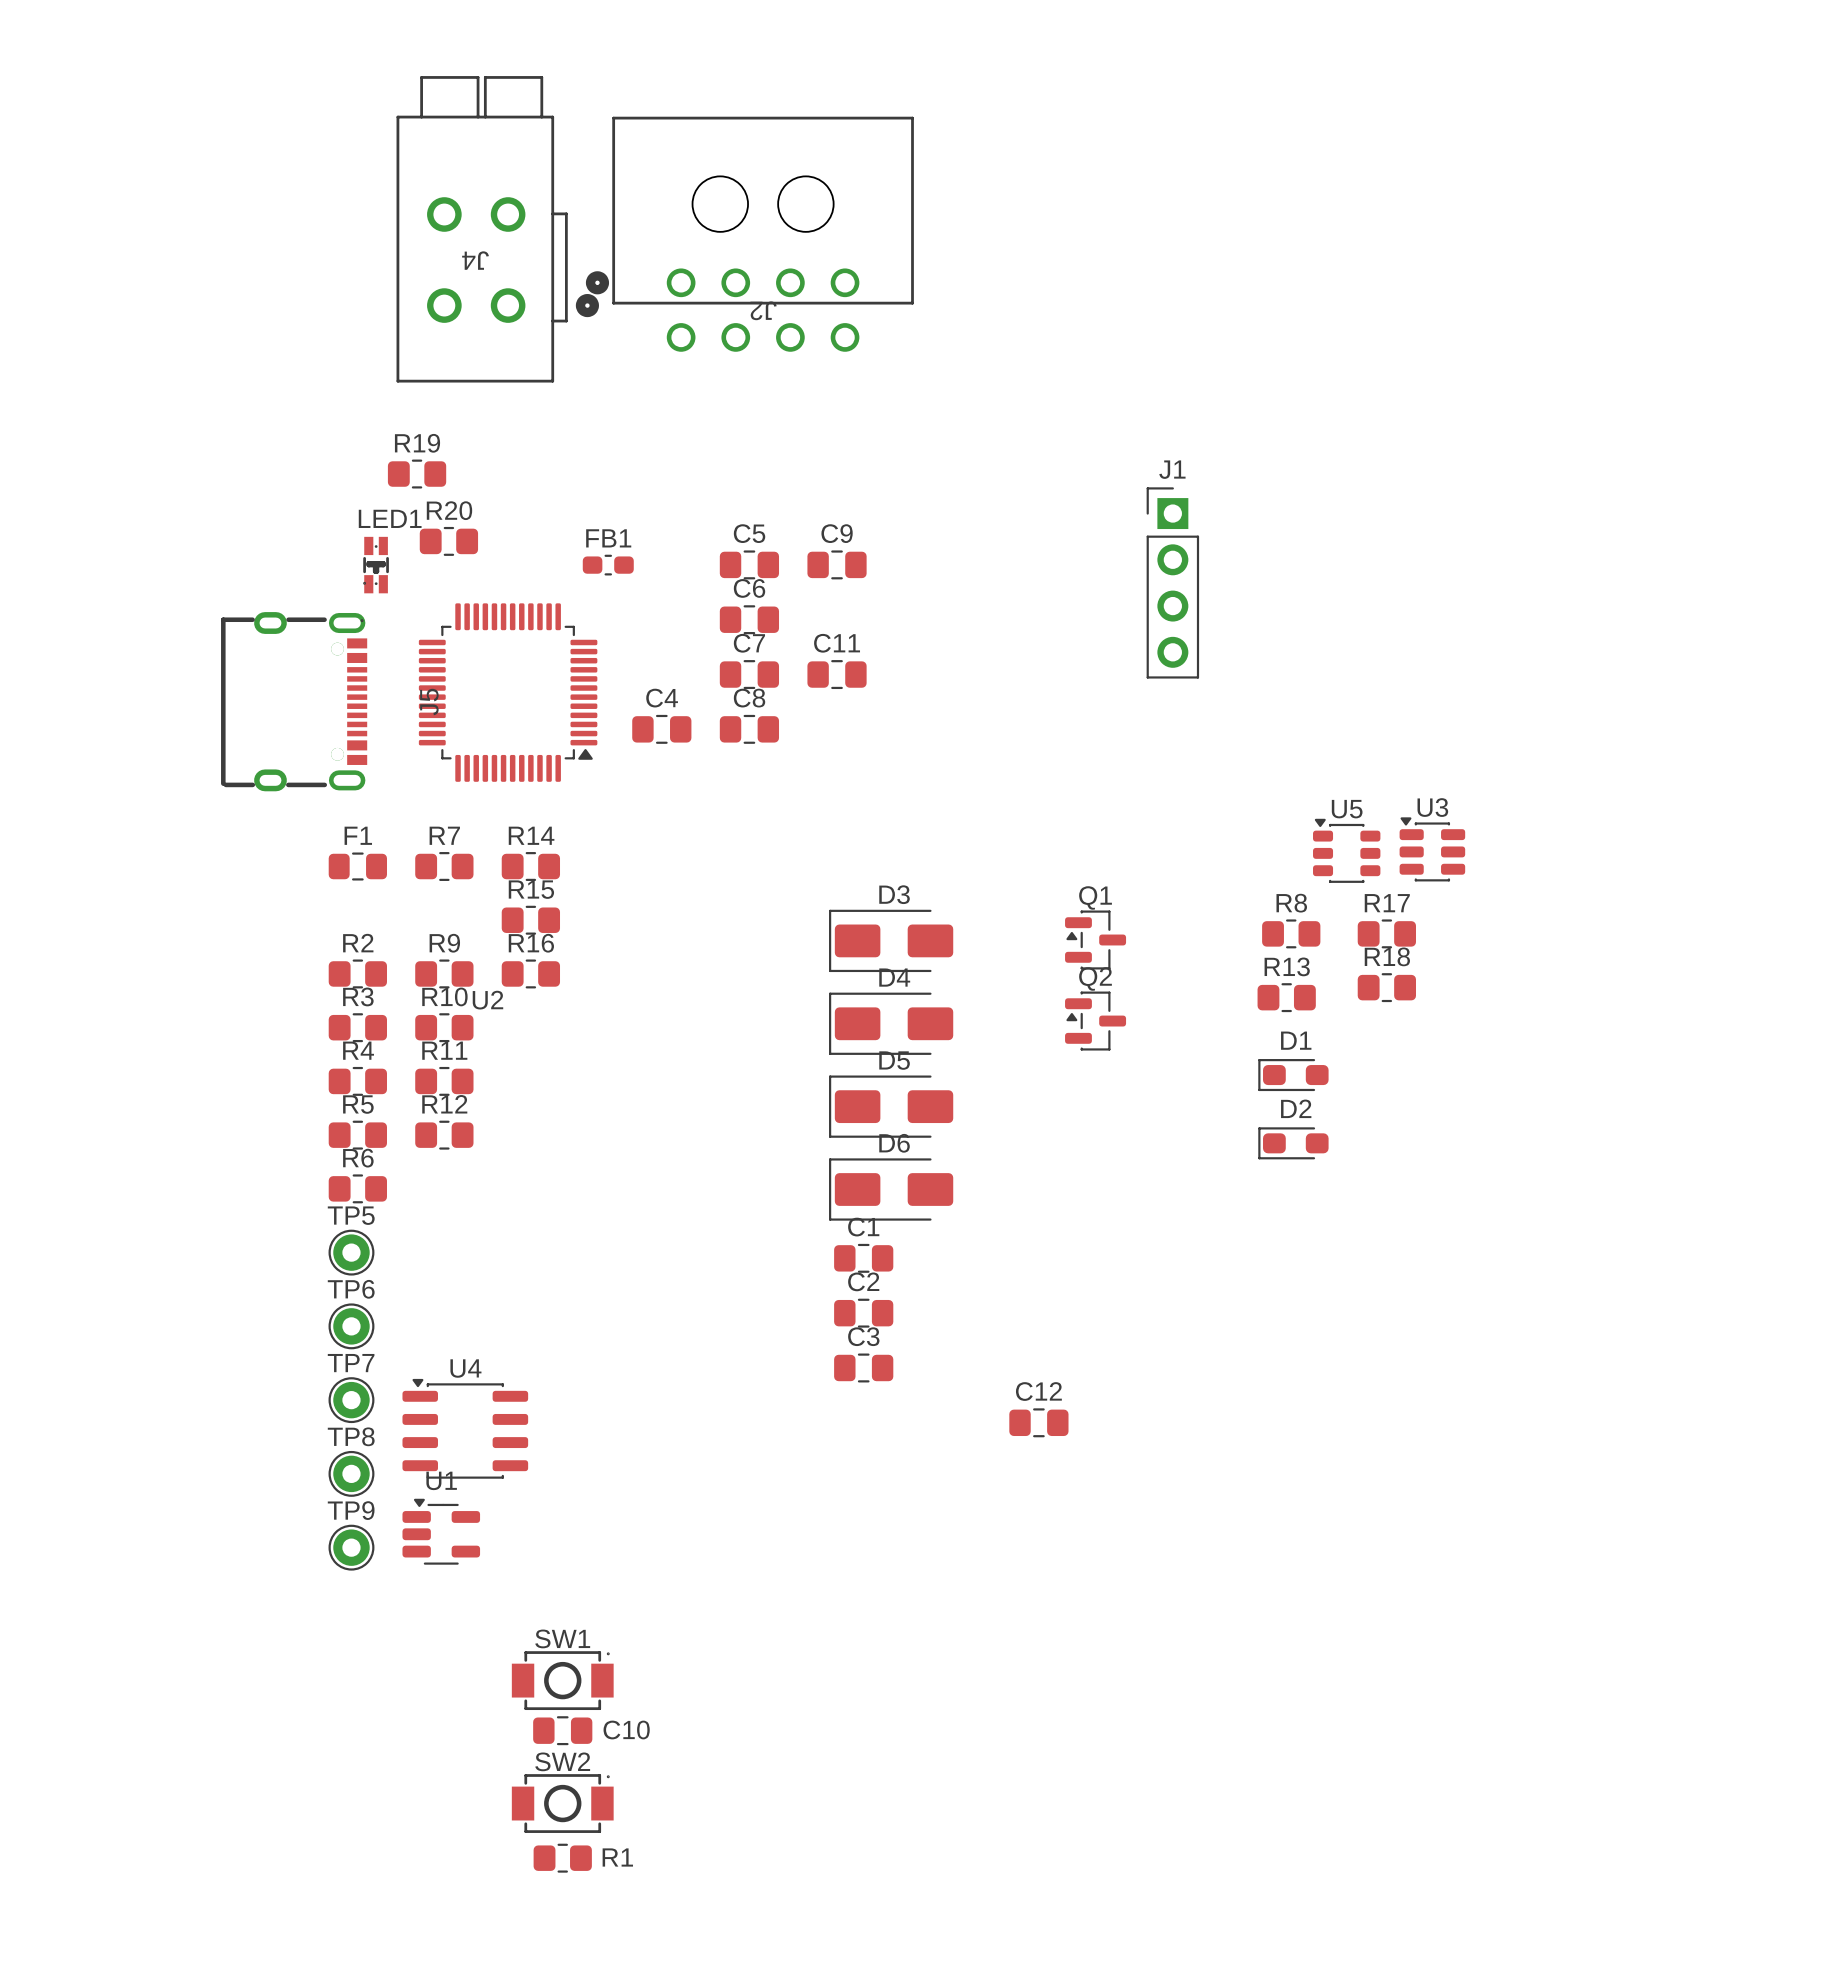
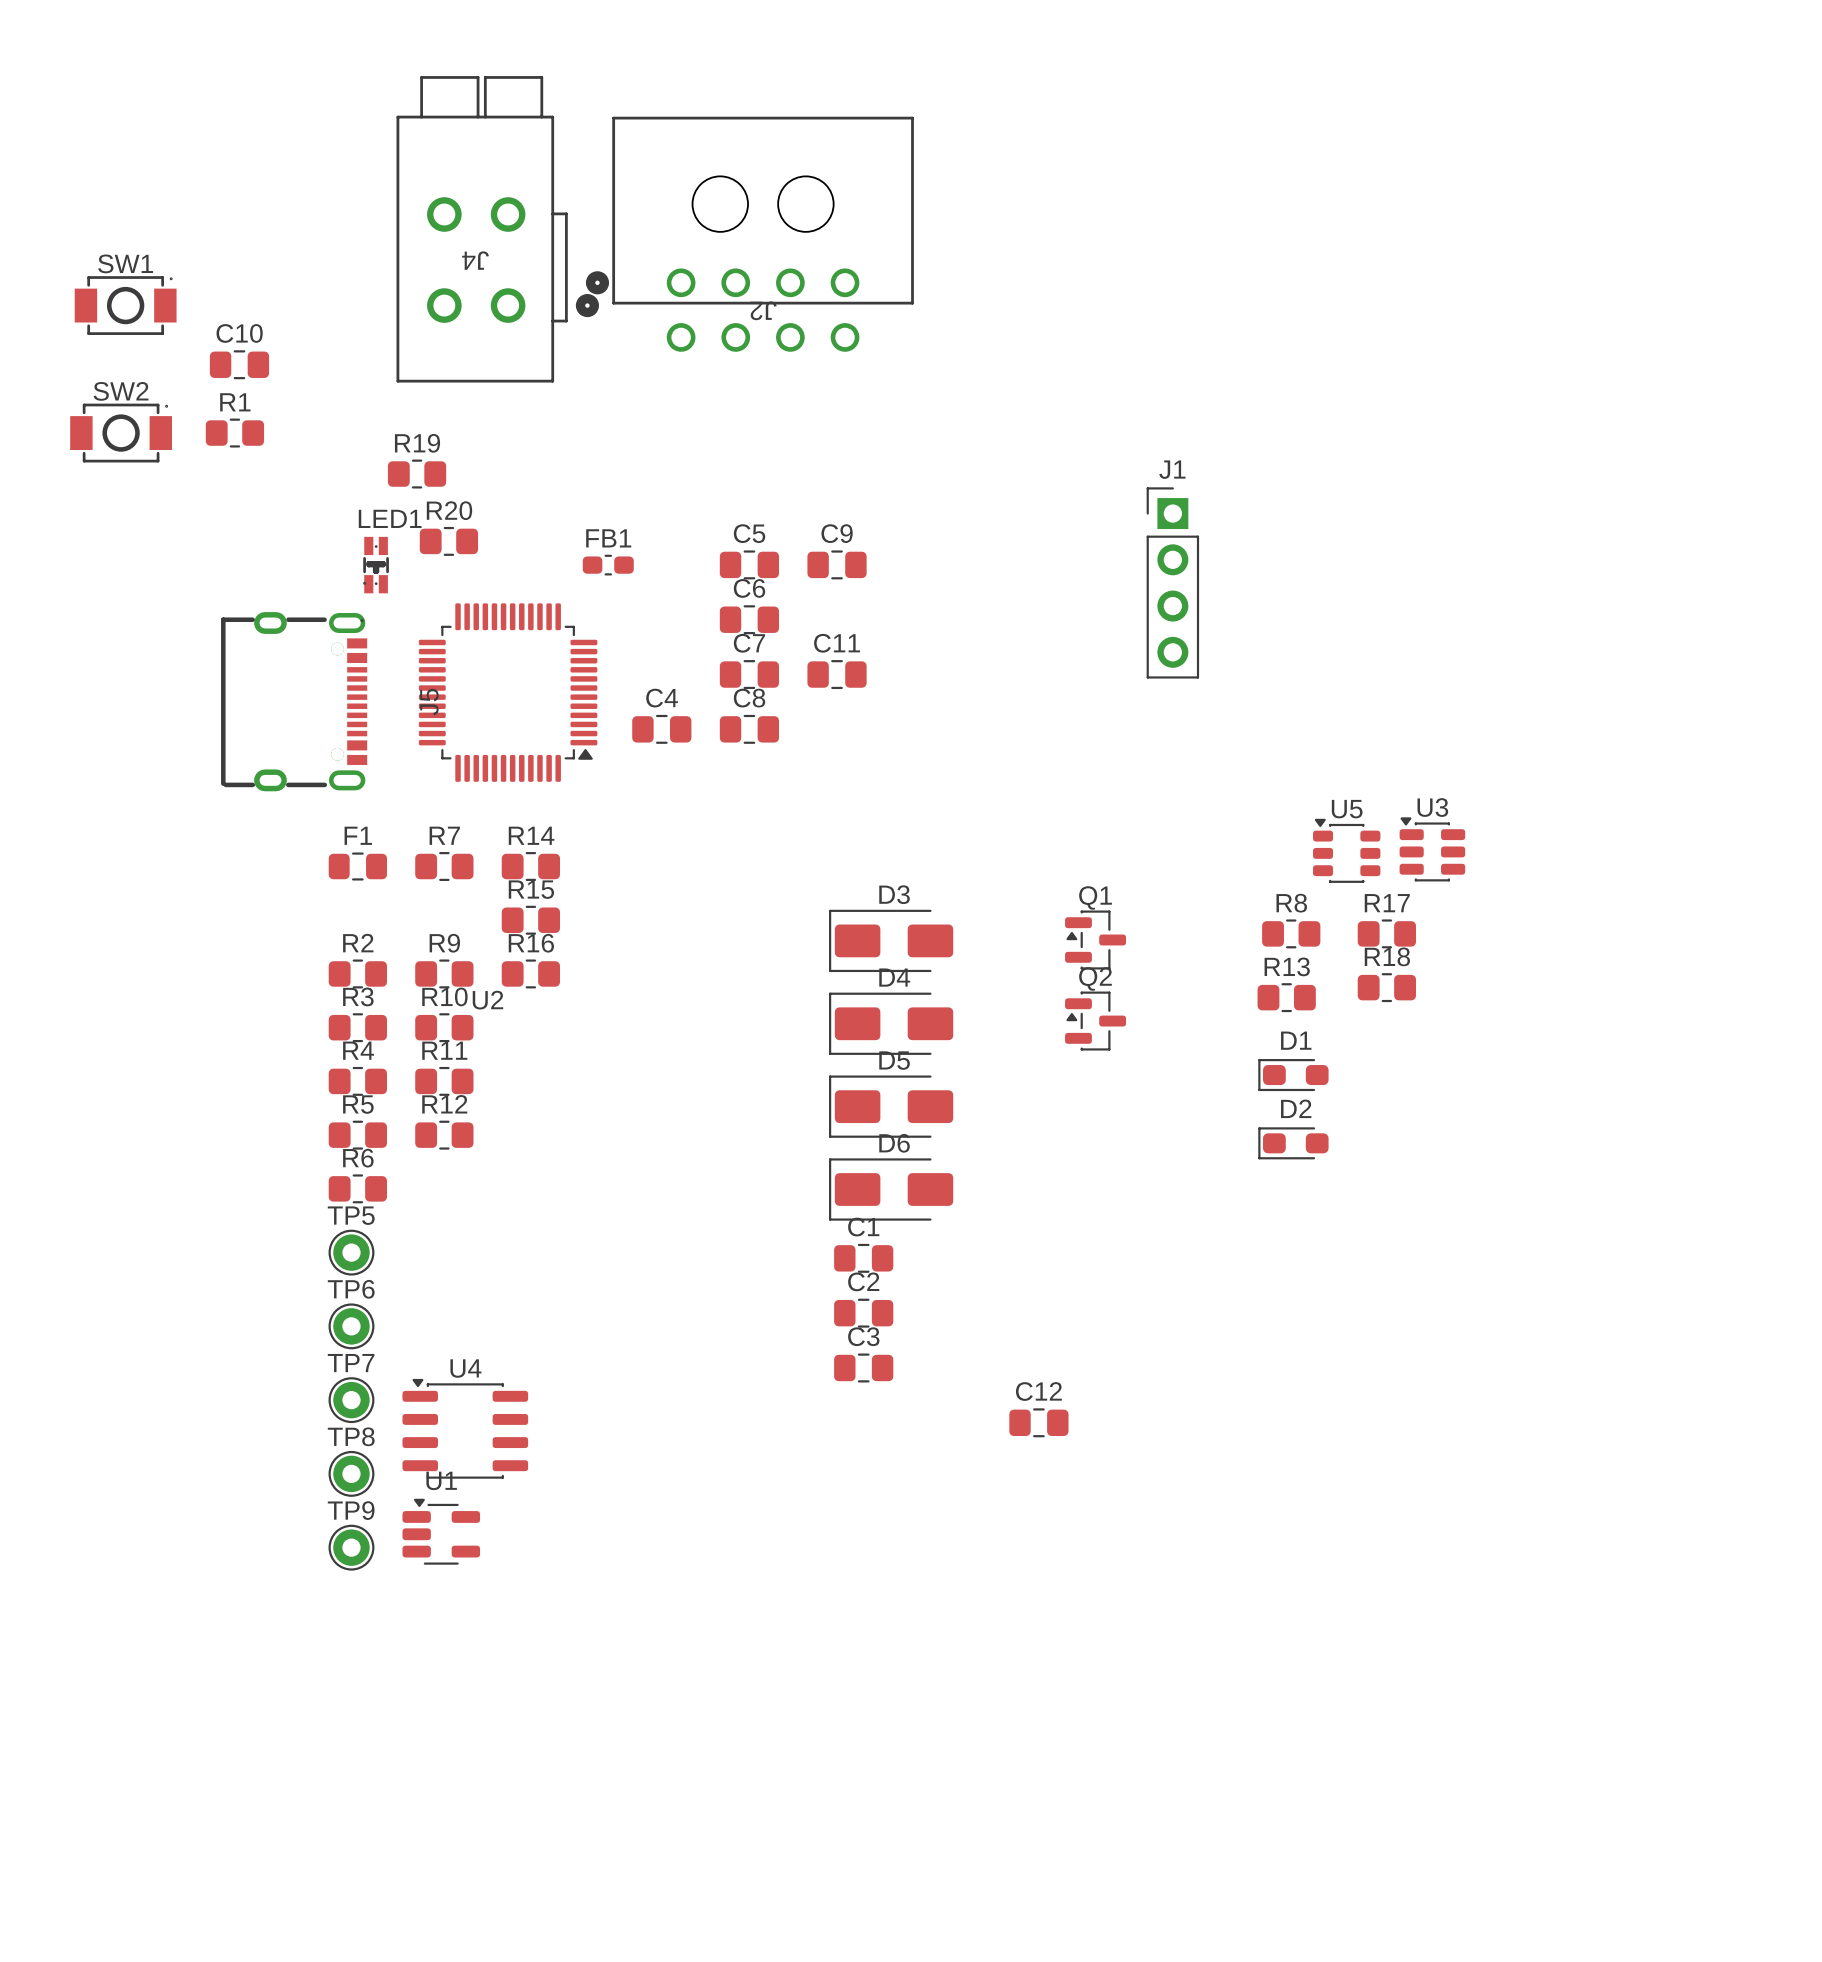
SW1 position: (562, 1680) -> (125, 305)
C10 position: (562, 1730) -> (239, 364)
C10 name position: C10 (626, 1730) -> C10 (239, 333)
SW2 position: (562, 1803) -> (121, 433)
R1 name position: R1 (617, 1857) -> R1 (235, 402)
R1 position: (562, 1858) -> (234, 433)

